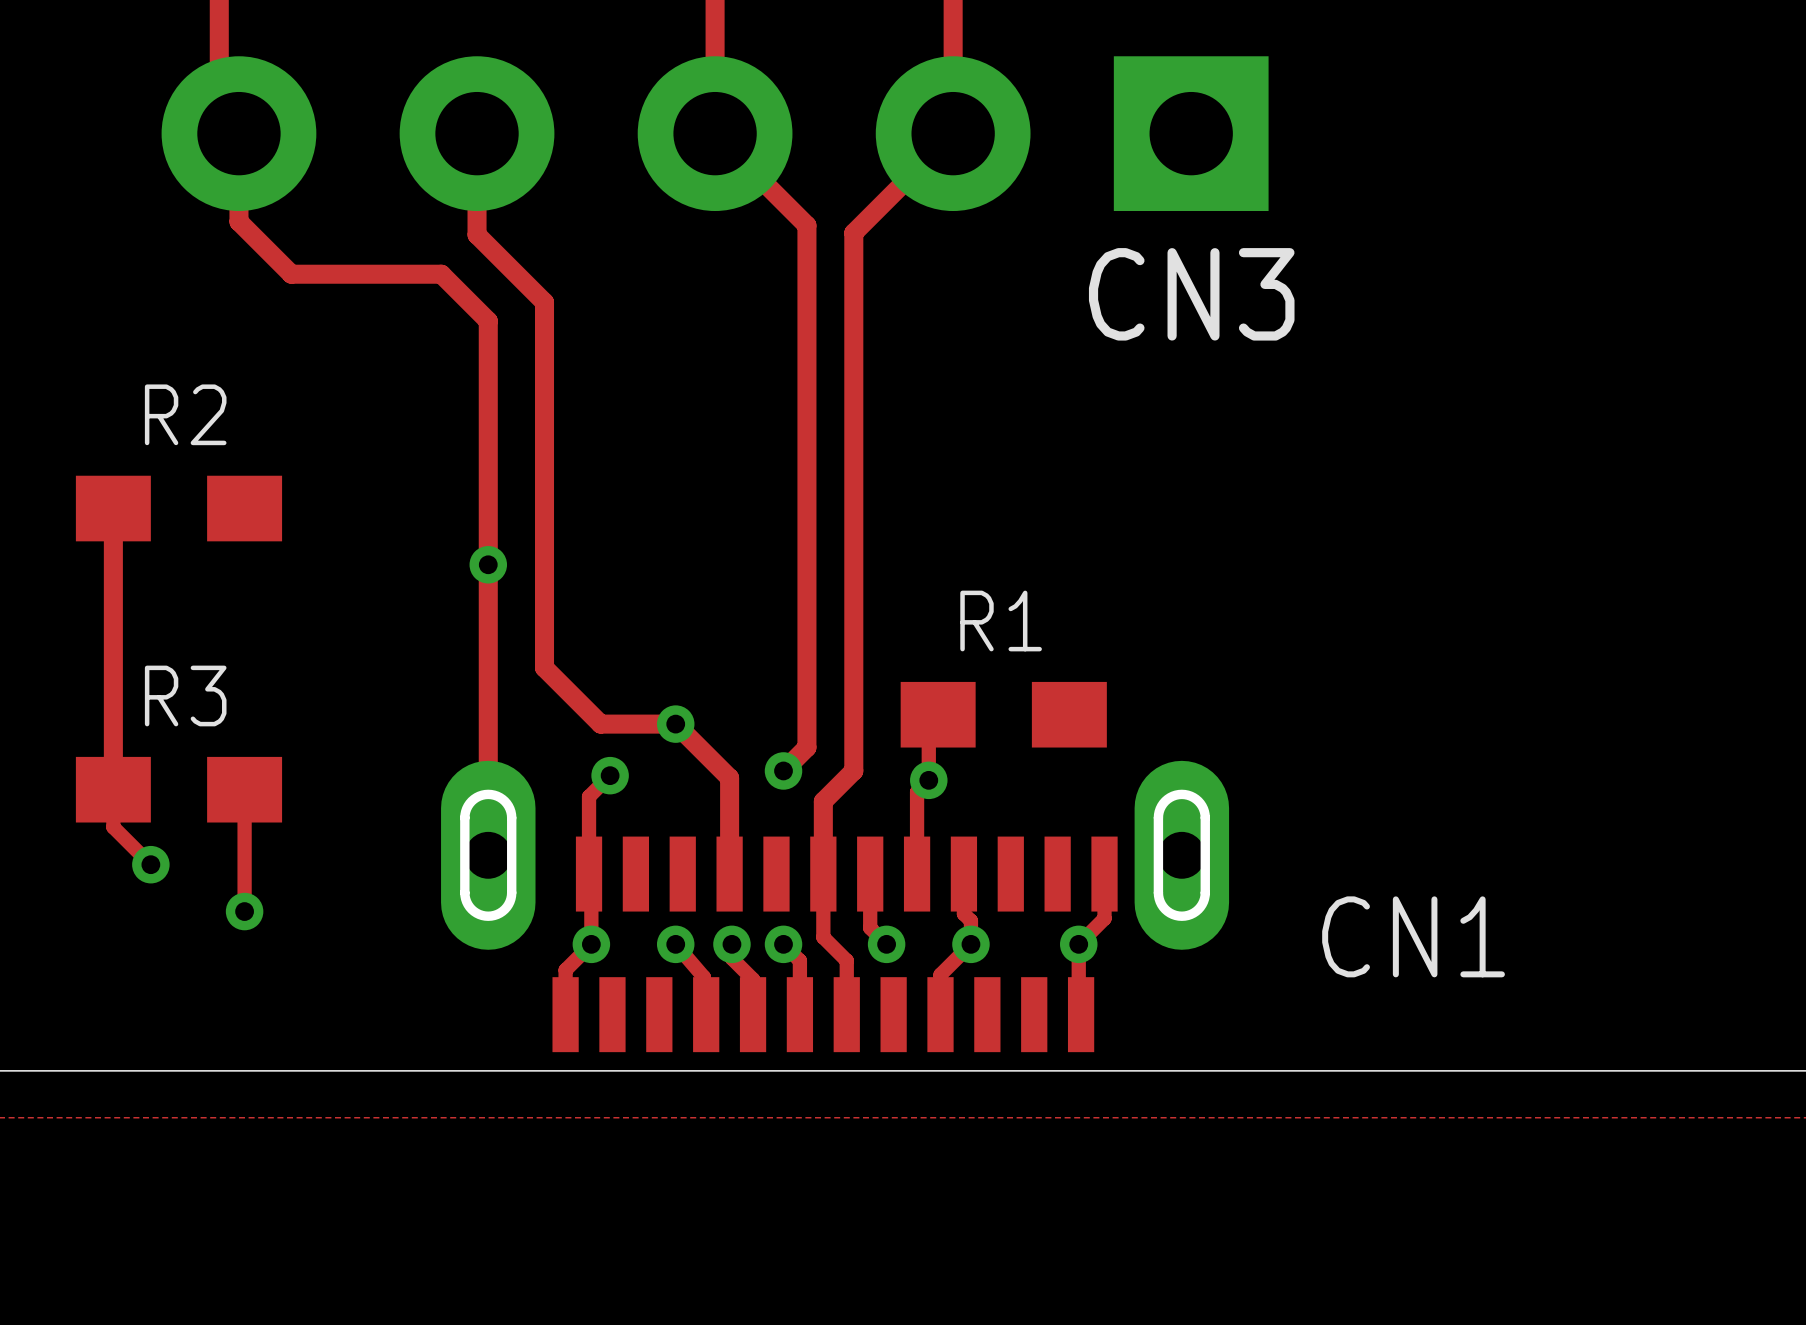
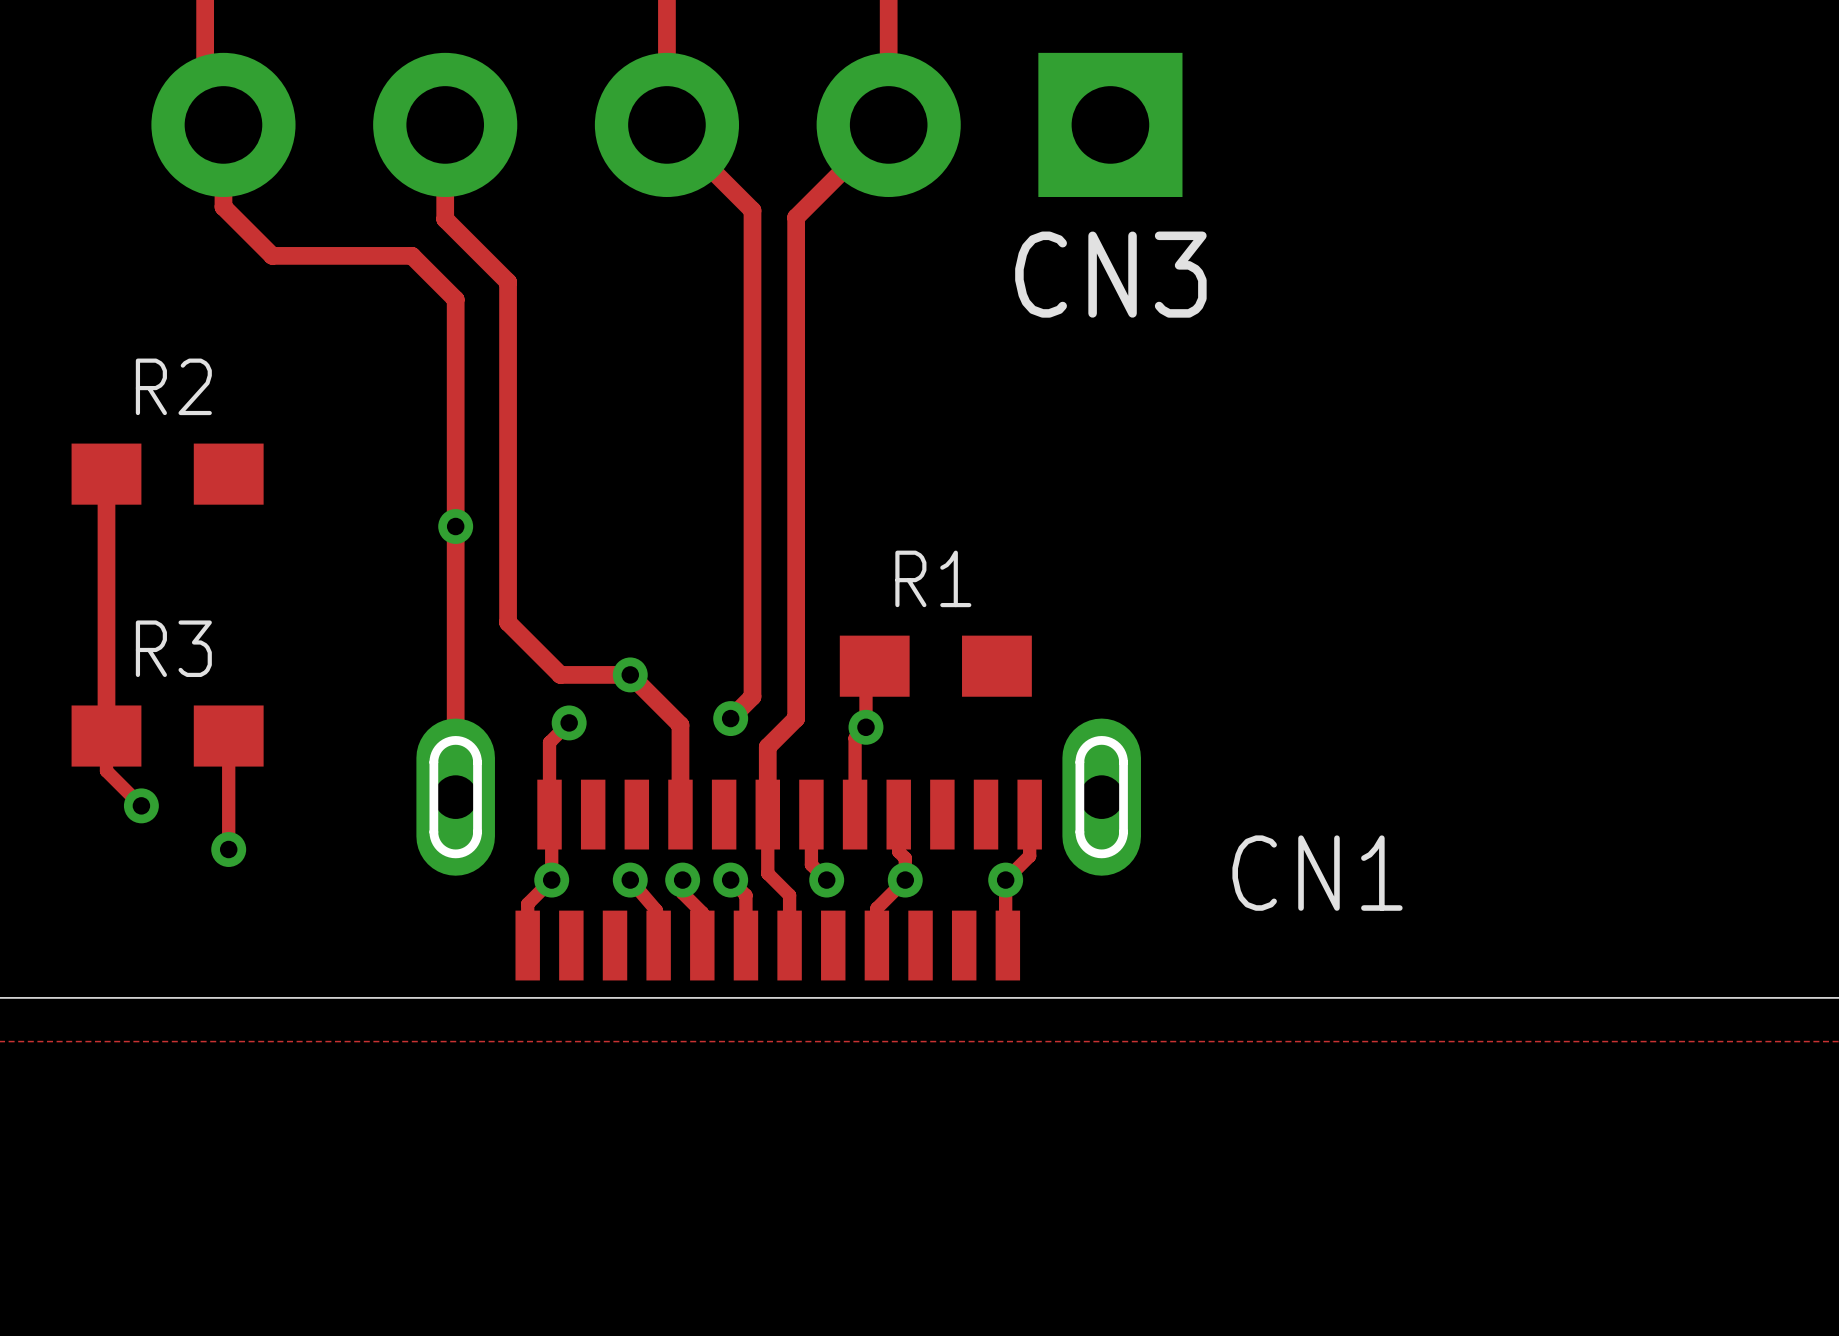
CN1 footprint: [441, 760, 1230, 1053] -> [416, 718, 1141, 981]

